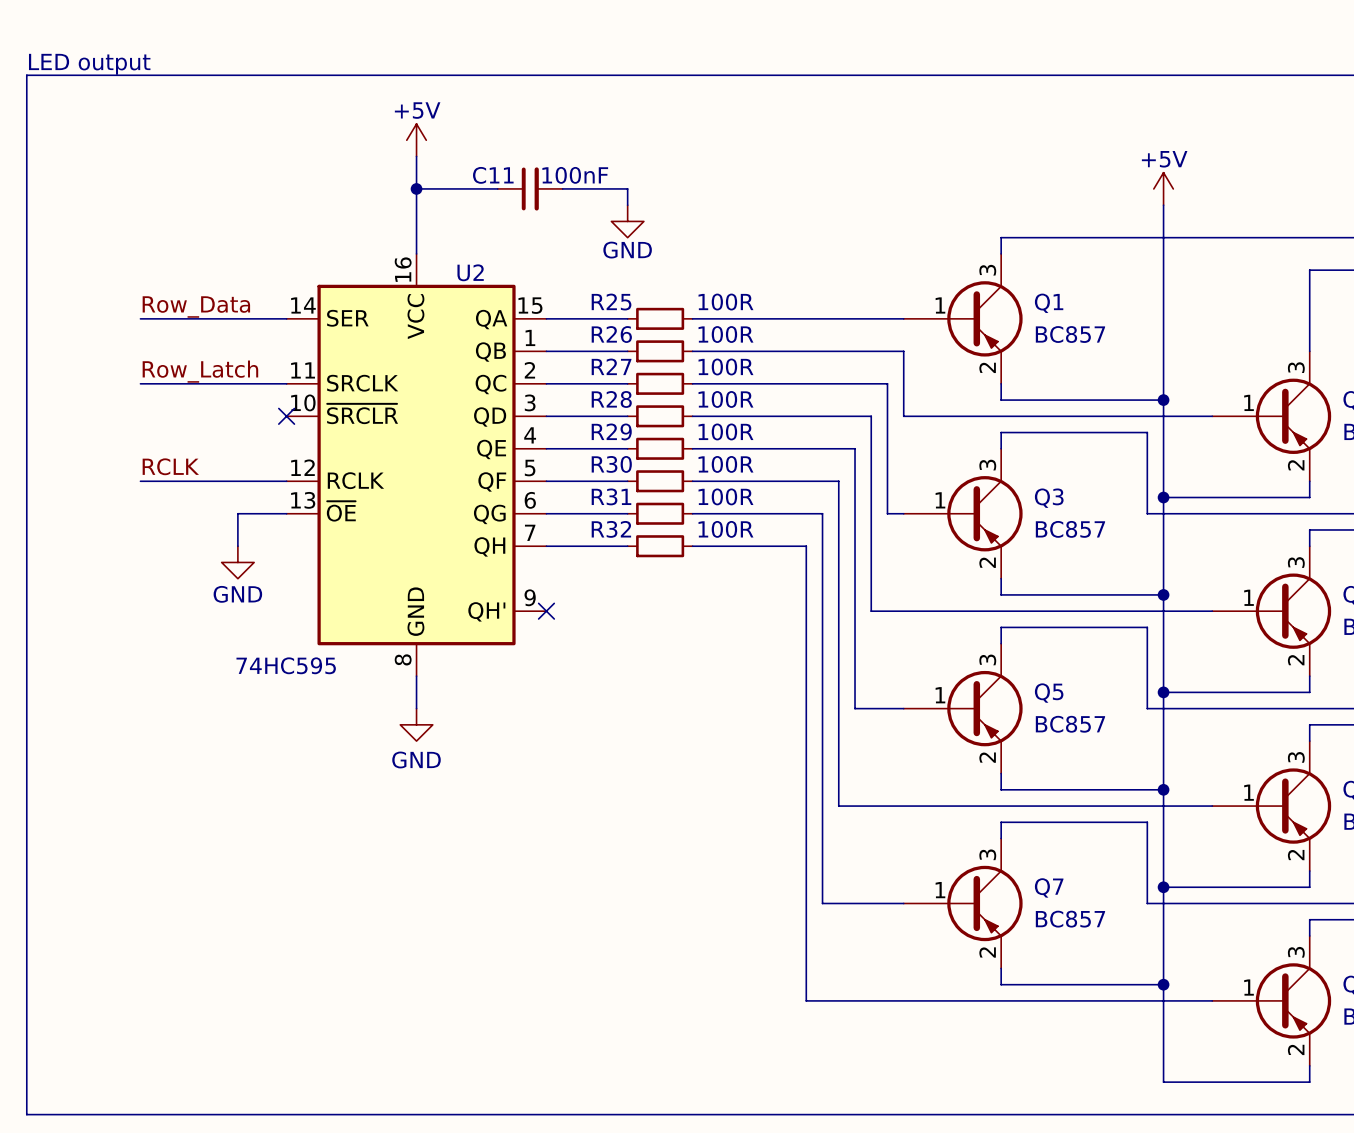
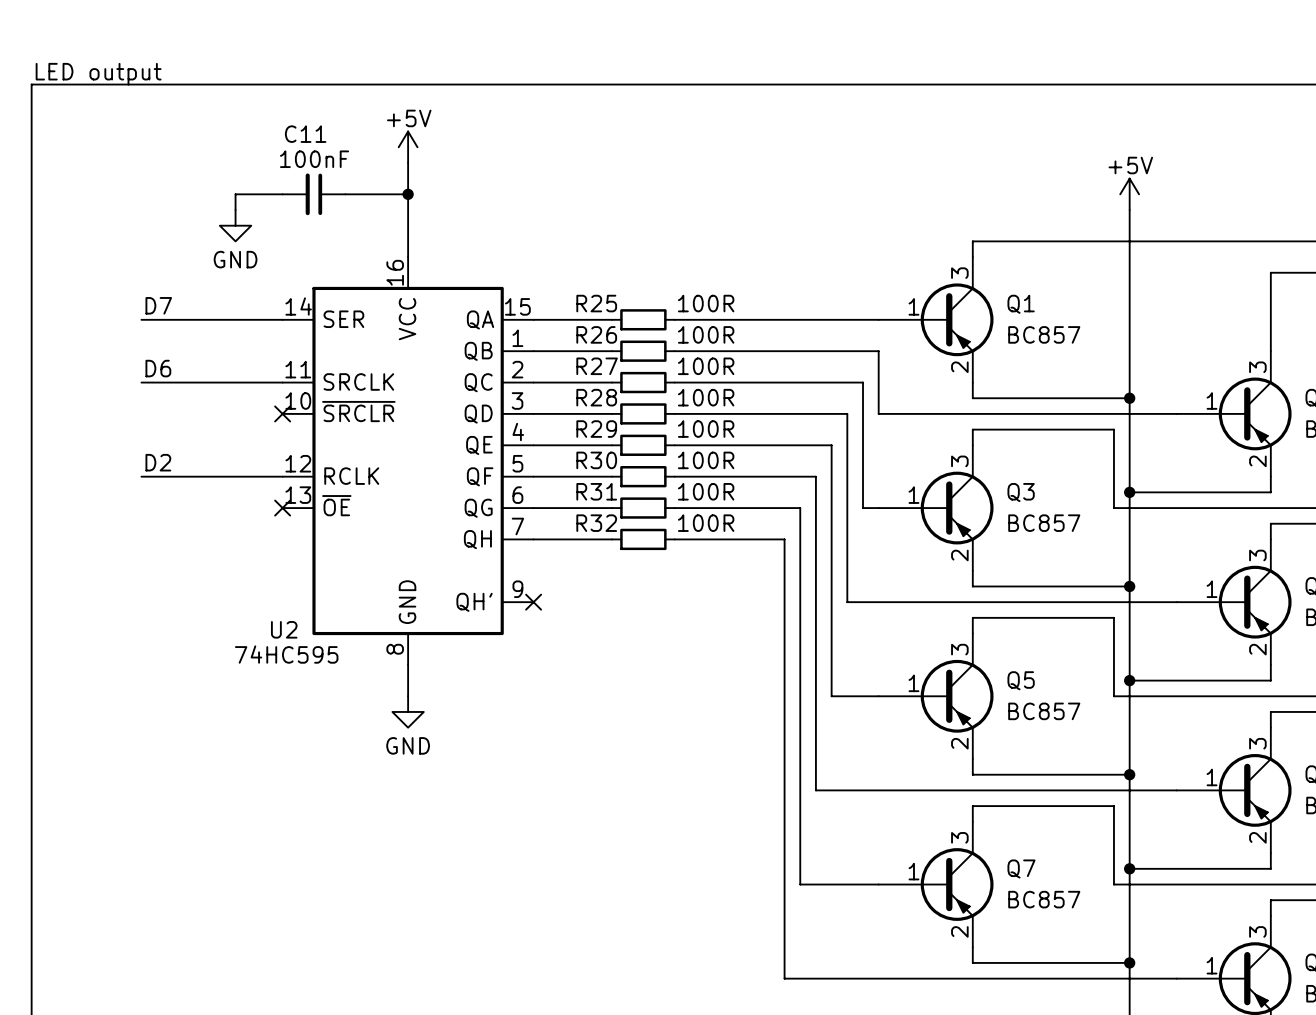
C11 name position: C11 (493, 175) -> C11 (305, 134)
C11 value position: 100nF (575, 175) -> 100nF (314, 159)
wire: none -> (282, 194) (235, 194) (235, 210)
wire: (416, 188) (497, 188) -> (408, 194) (345, 194)
C11 rotation: 0° (530, 188) -> 180° (313, 194)
C11 position: (530, 188) -> (313, 194)
wire: (562, 188) (627, 188) (627, 205) -> none
power symbol: none -> GND (235, 225)
power symbol: GND (627, 221) -> none
U2 name position: U2 (470, 272) -> U2 (284, 629)
label: Row_Data (196, 307) -> D7 (158, 305)
label: Row_Latch (200, 371) -> D6 (158, 368)
label: RCLK (170, 466) -> D2 (158, 462)
wire: (286, 513) (237, 513) (237, 546) -> none
no-connect mark: none -> (282, 508)
power symbol: GND (237, 562) -> none

